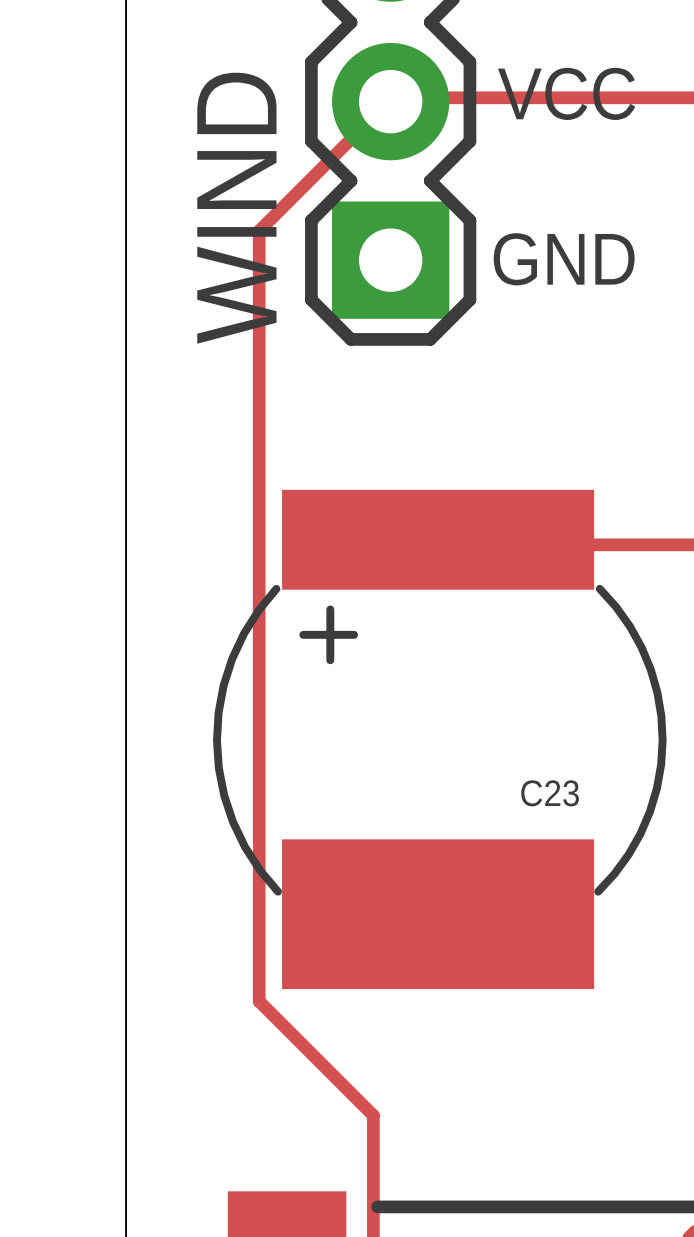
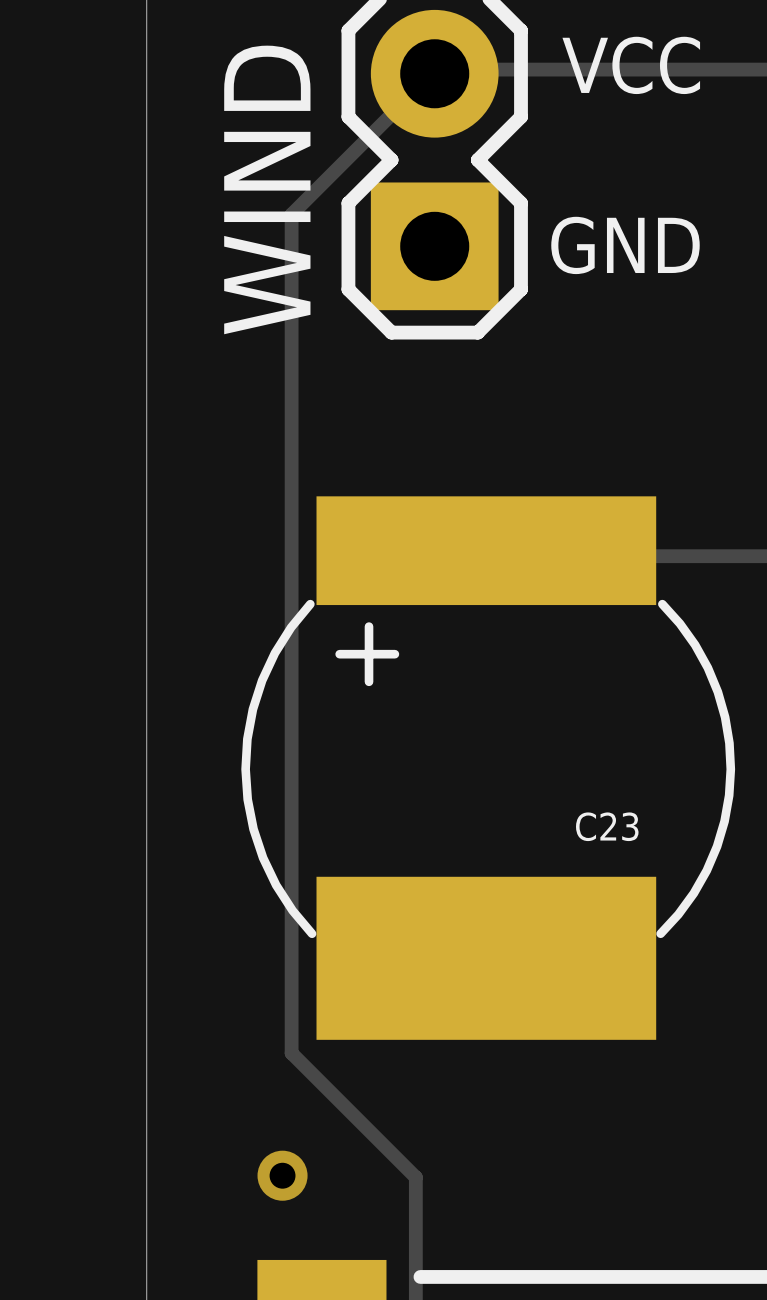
via: none -> (282, 1175)

